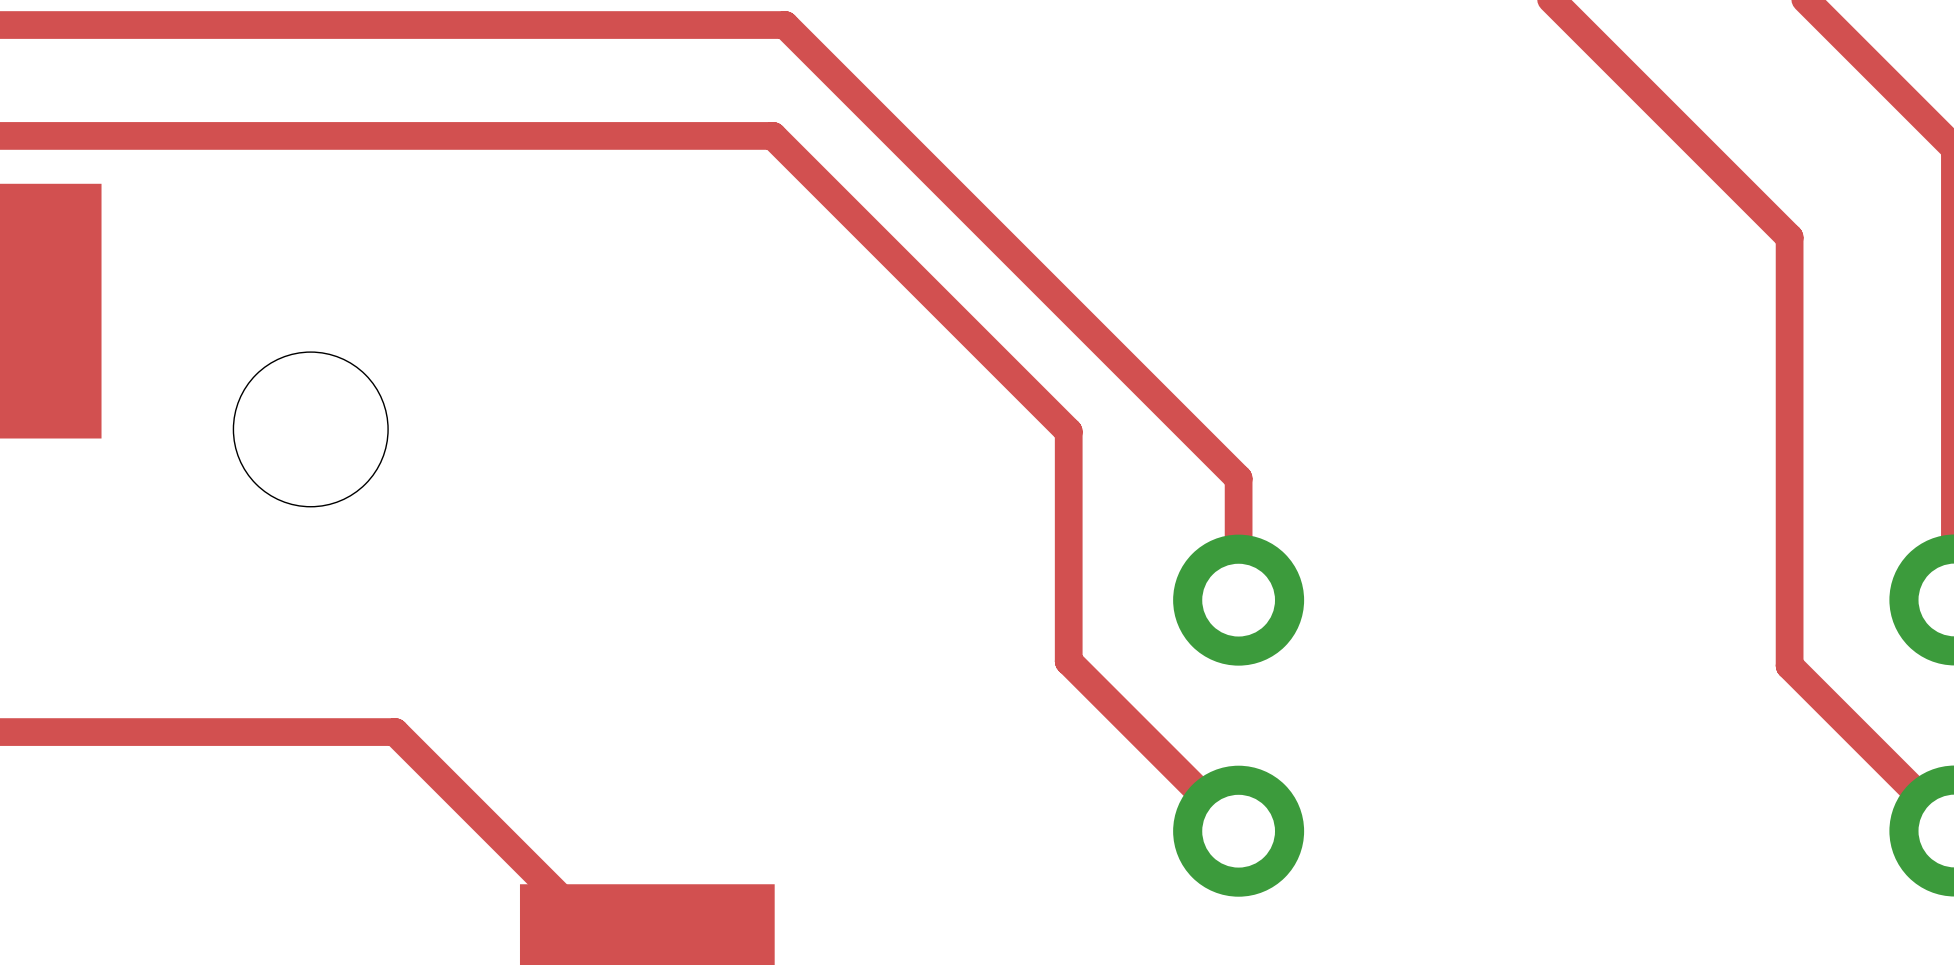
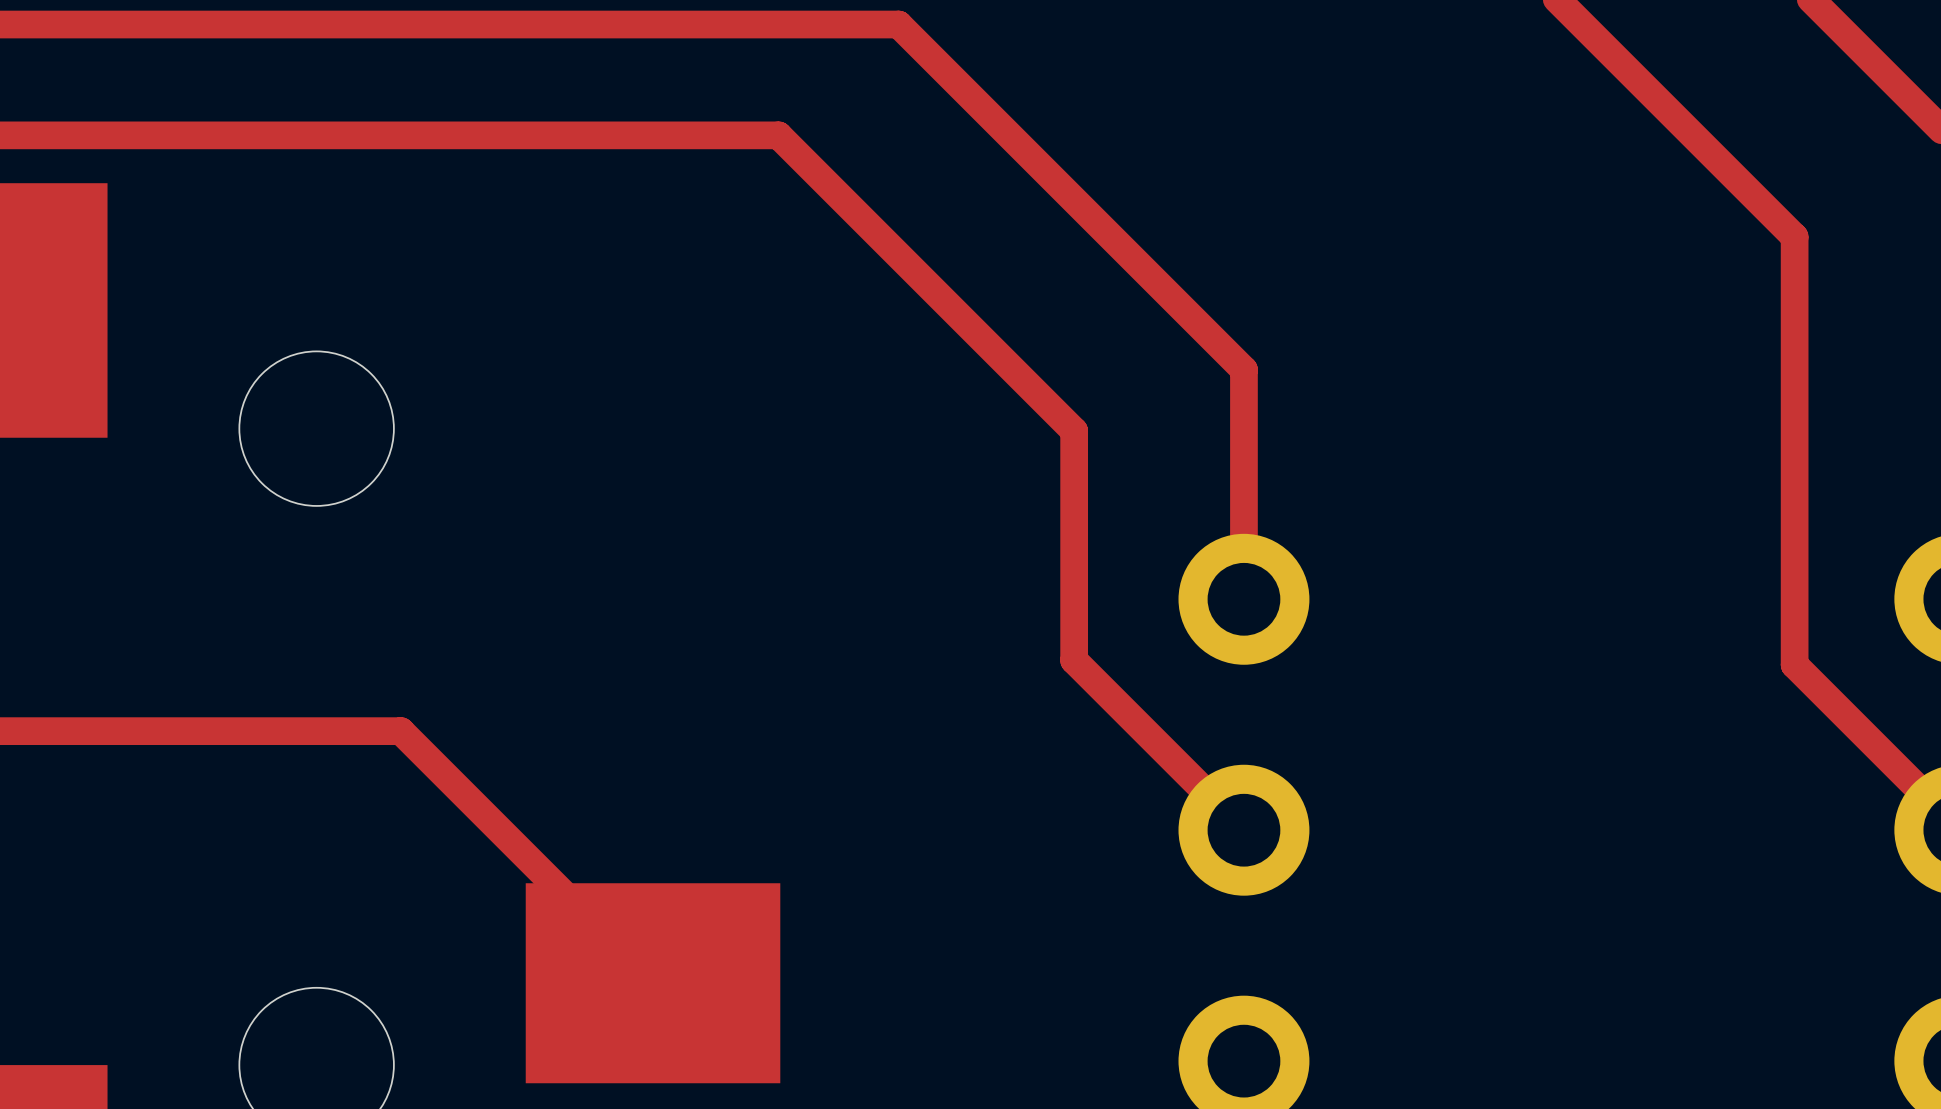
top track: (785, 25) (1238, 478) -> (790, 24) (898, 24) (1243, 369) (1243, 477)

